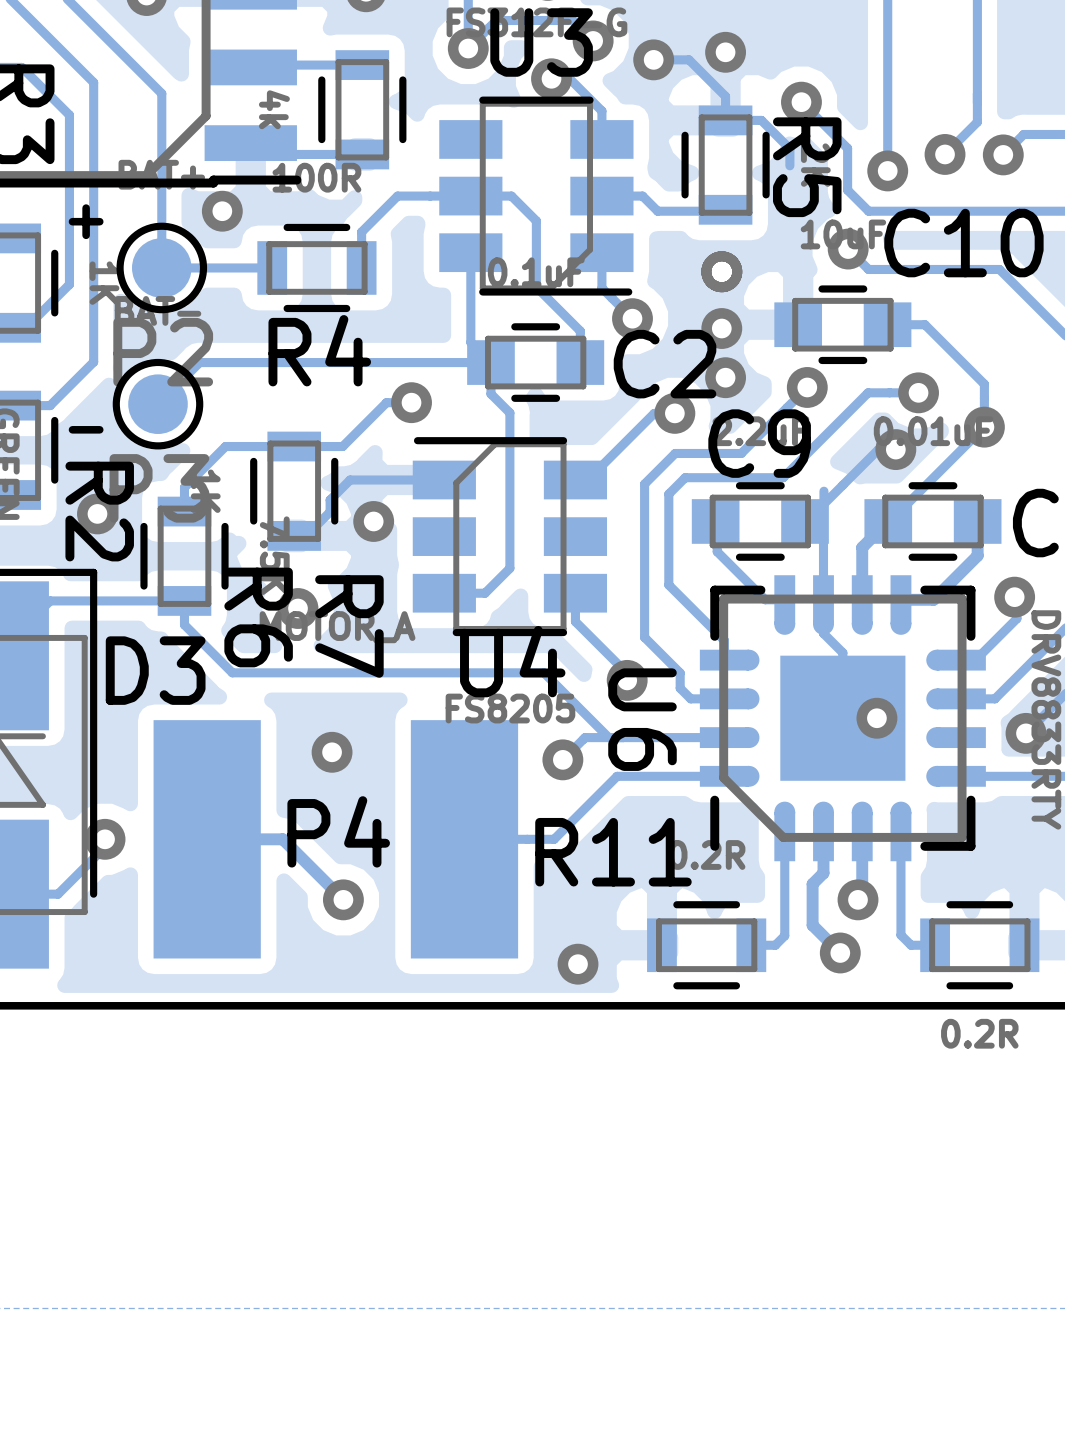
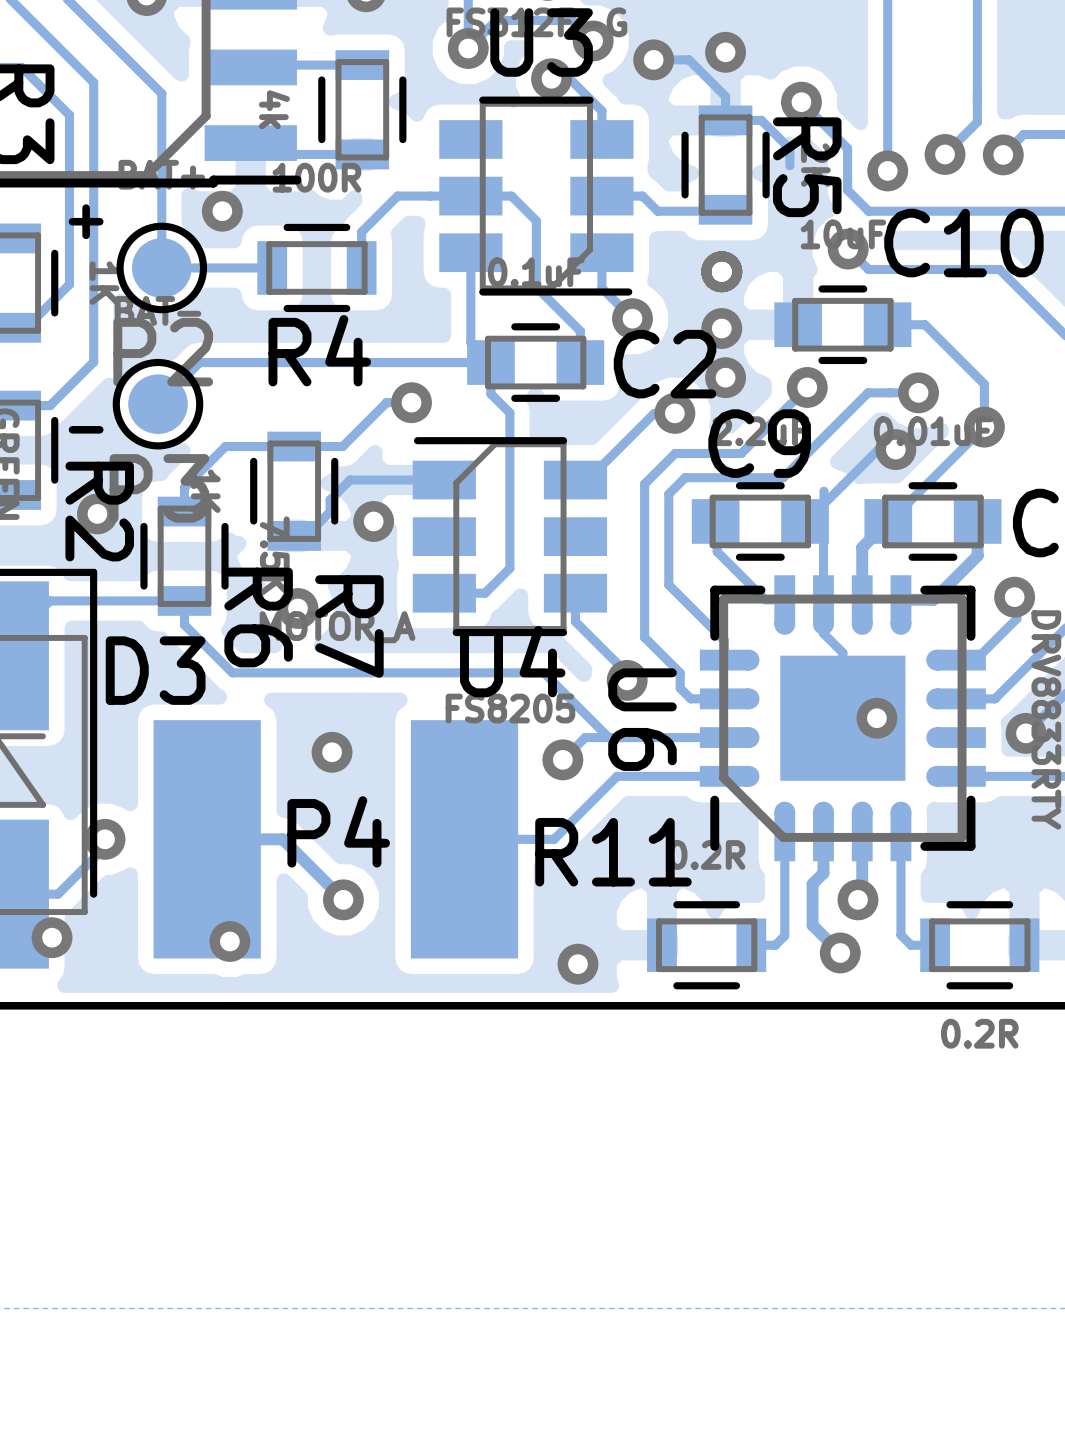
via: none -> (52, 937)
via: none -> (229, 941)

